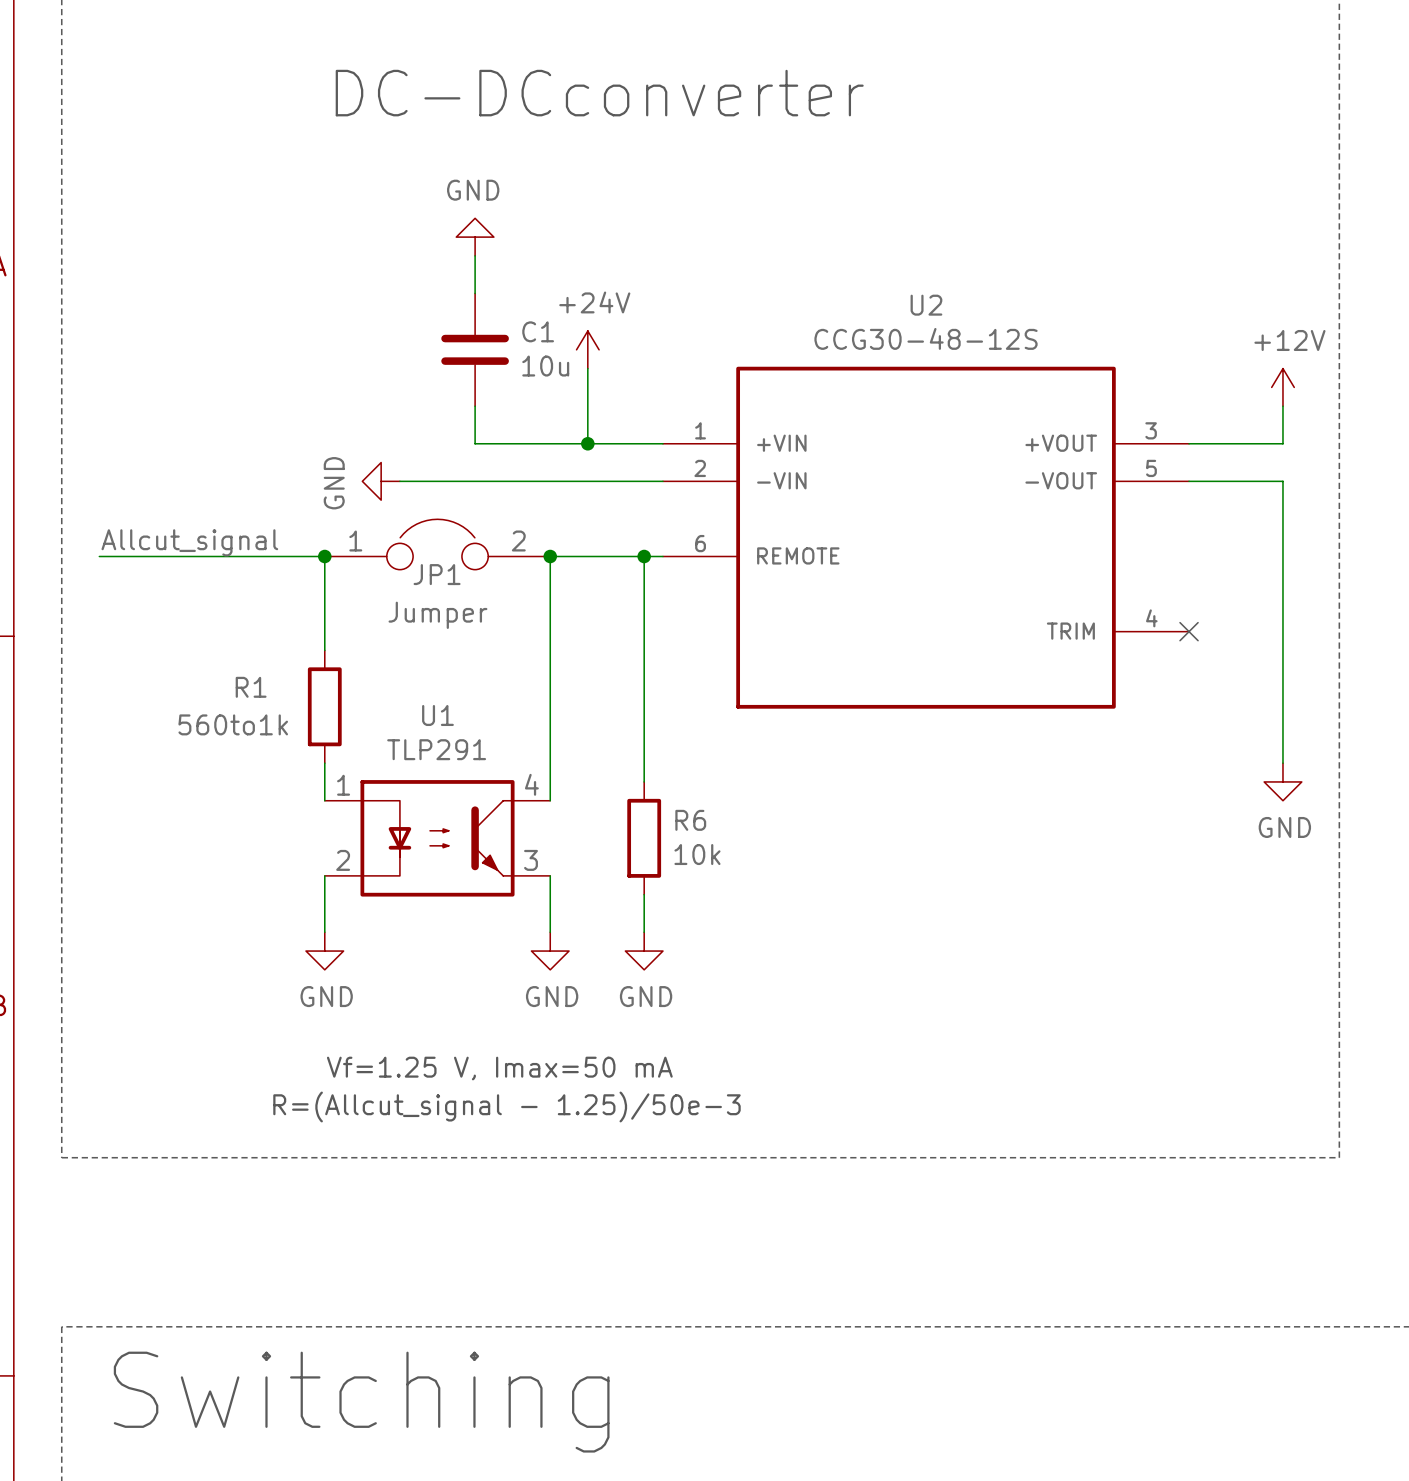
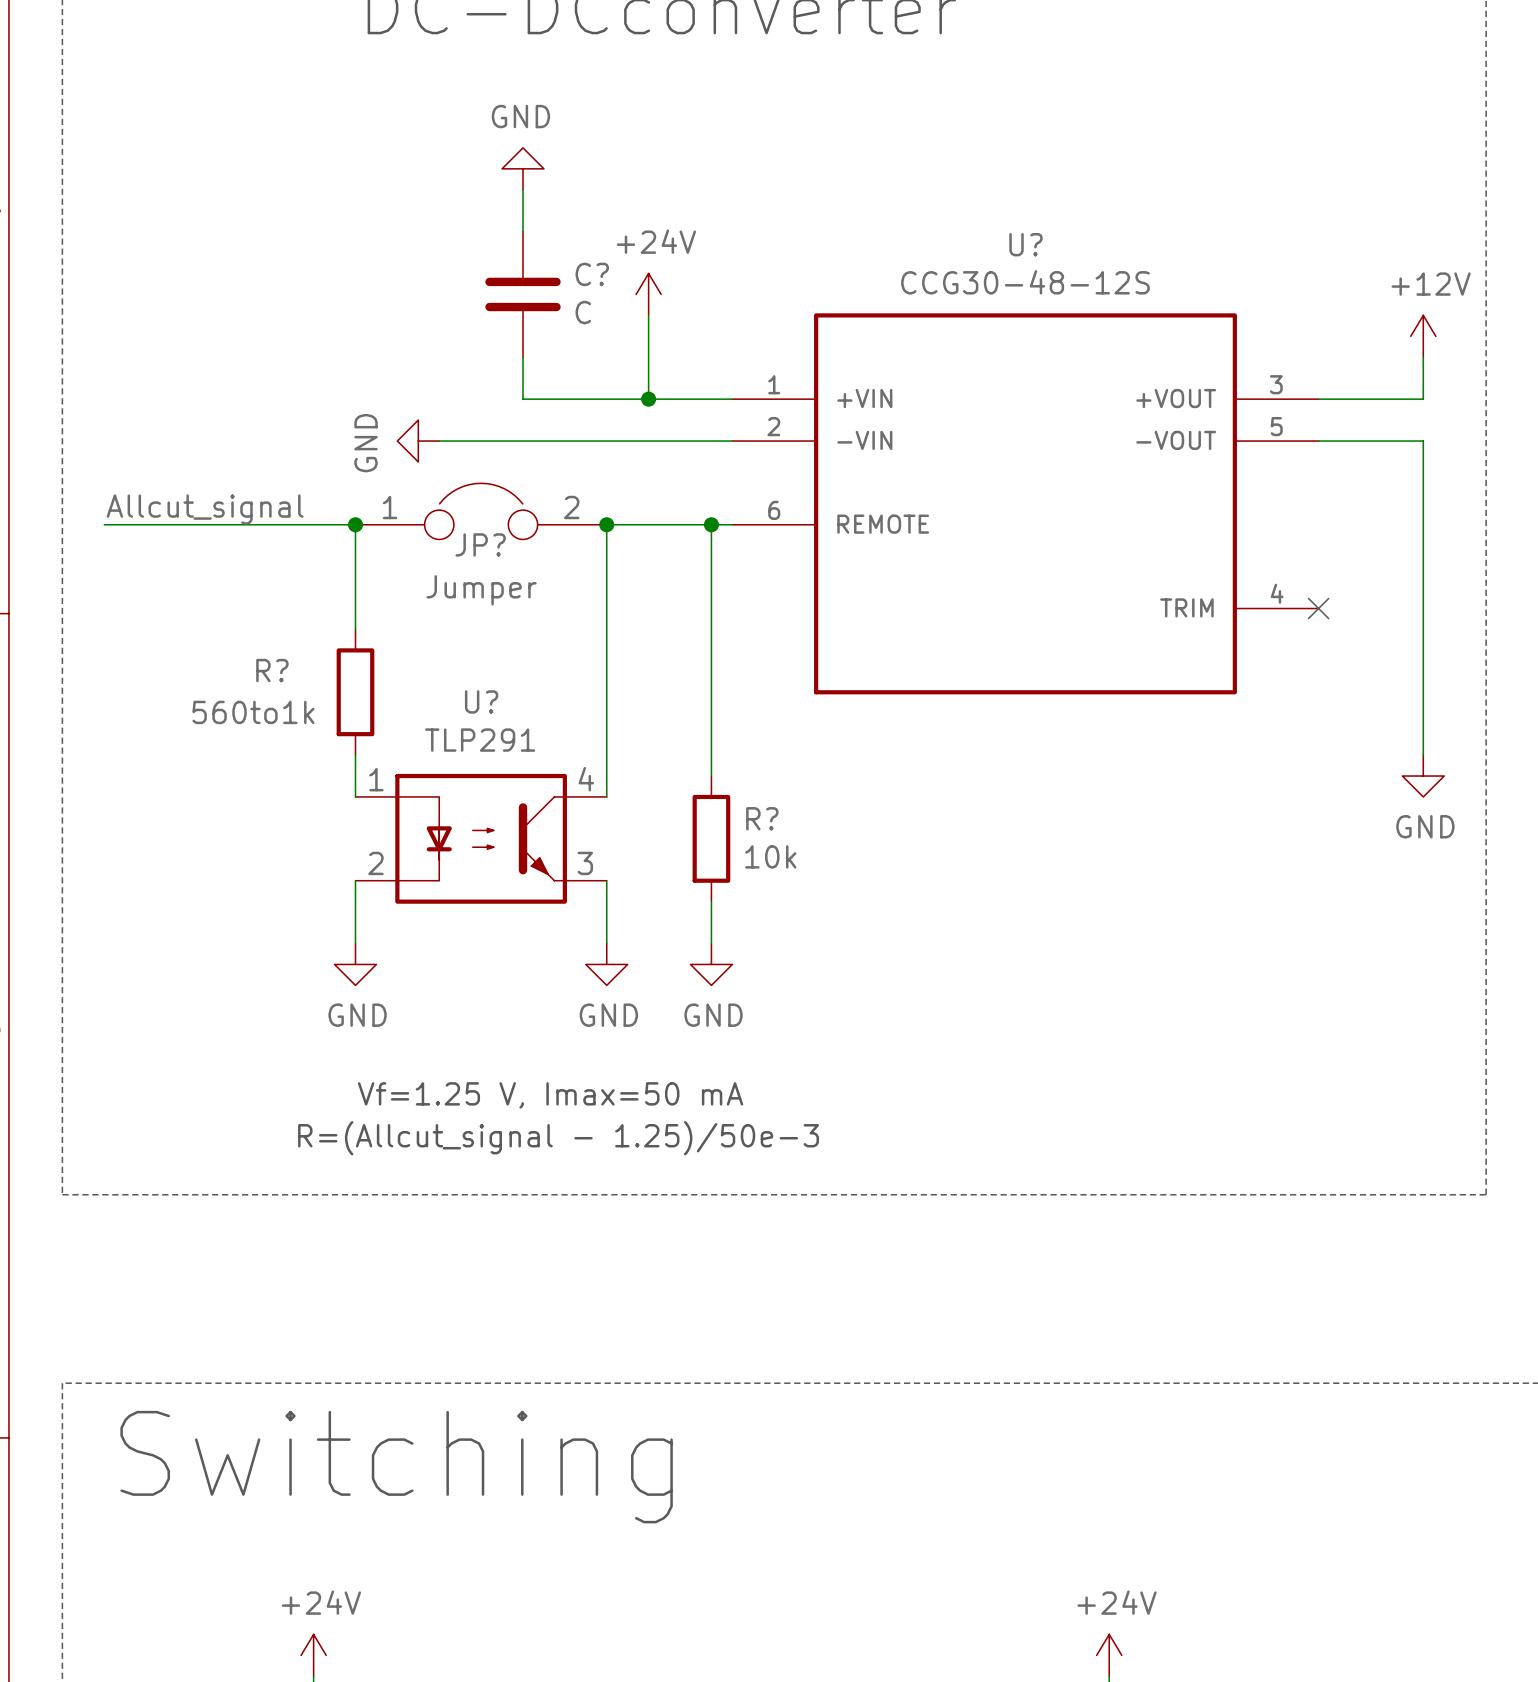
U2 name: U2 (926, 305) -> U? (1025, 244)
C1 name: C1 (538, 331) -> C? (592, 274)
C1 value: 10u (545, 366) -> C (583, 312)
JP1 name: JP1 (437, 574) -> JP? (480, 544)
R1 name: R1 (251, 687) -> R? (272, 670)
U1 name: U1 (437, 715) -> U? (481, 701)
R6 name: R6 (690, 820) -> R? (762, 818)

